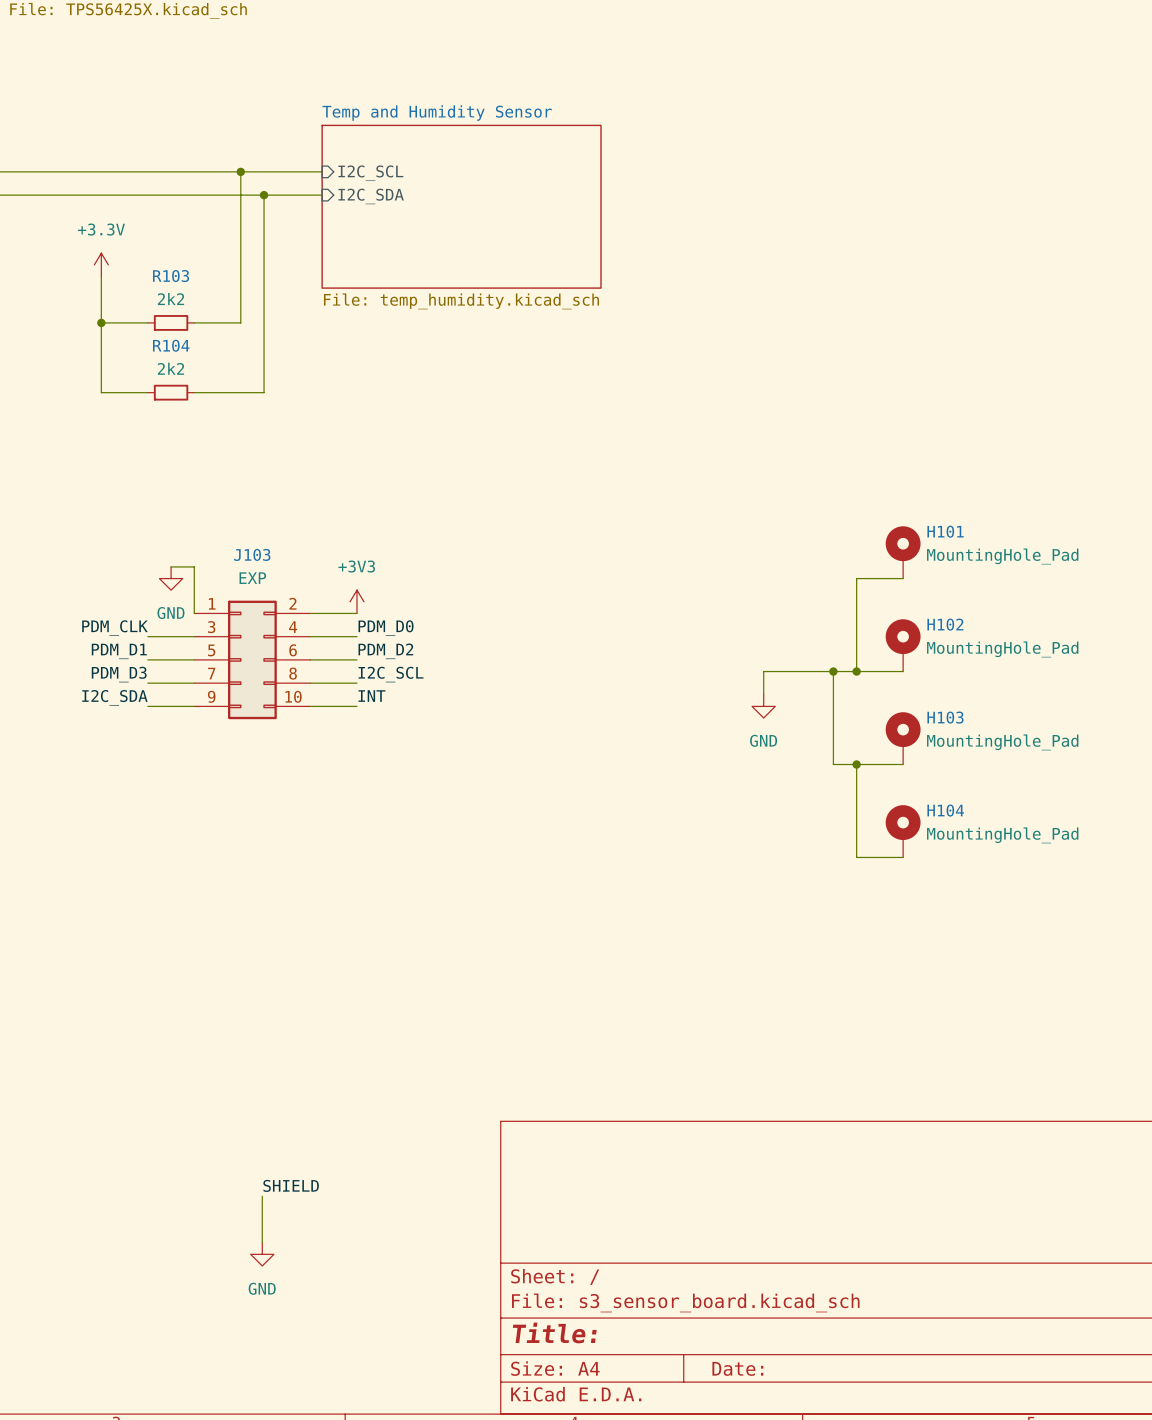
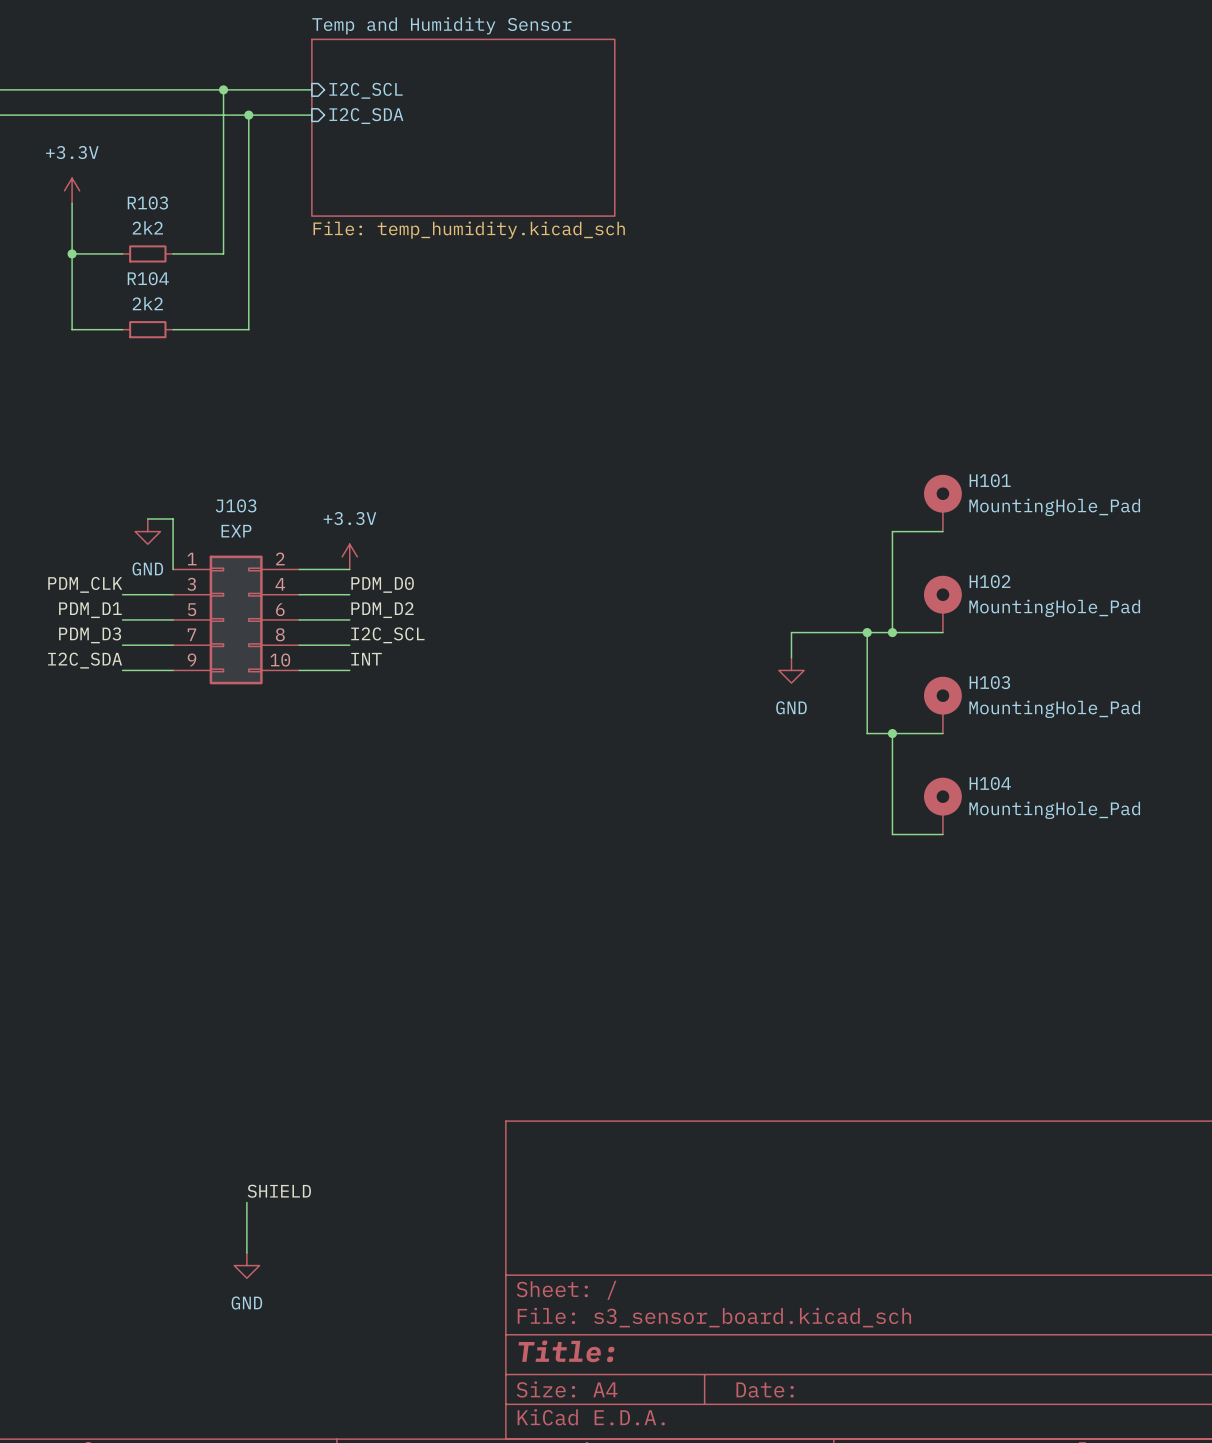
power symbol: +3V3 (356, 601) -> +3.3V (349, 556)

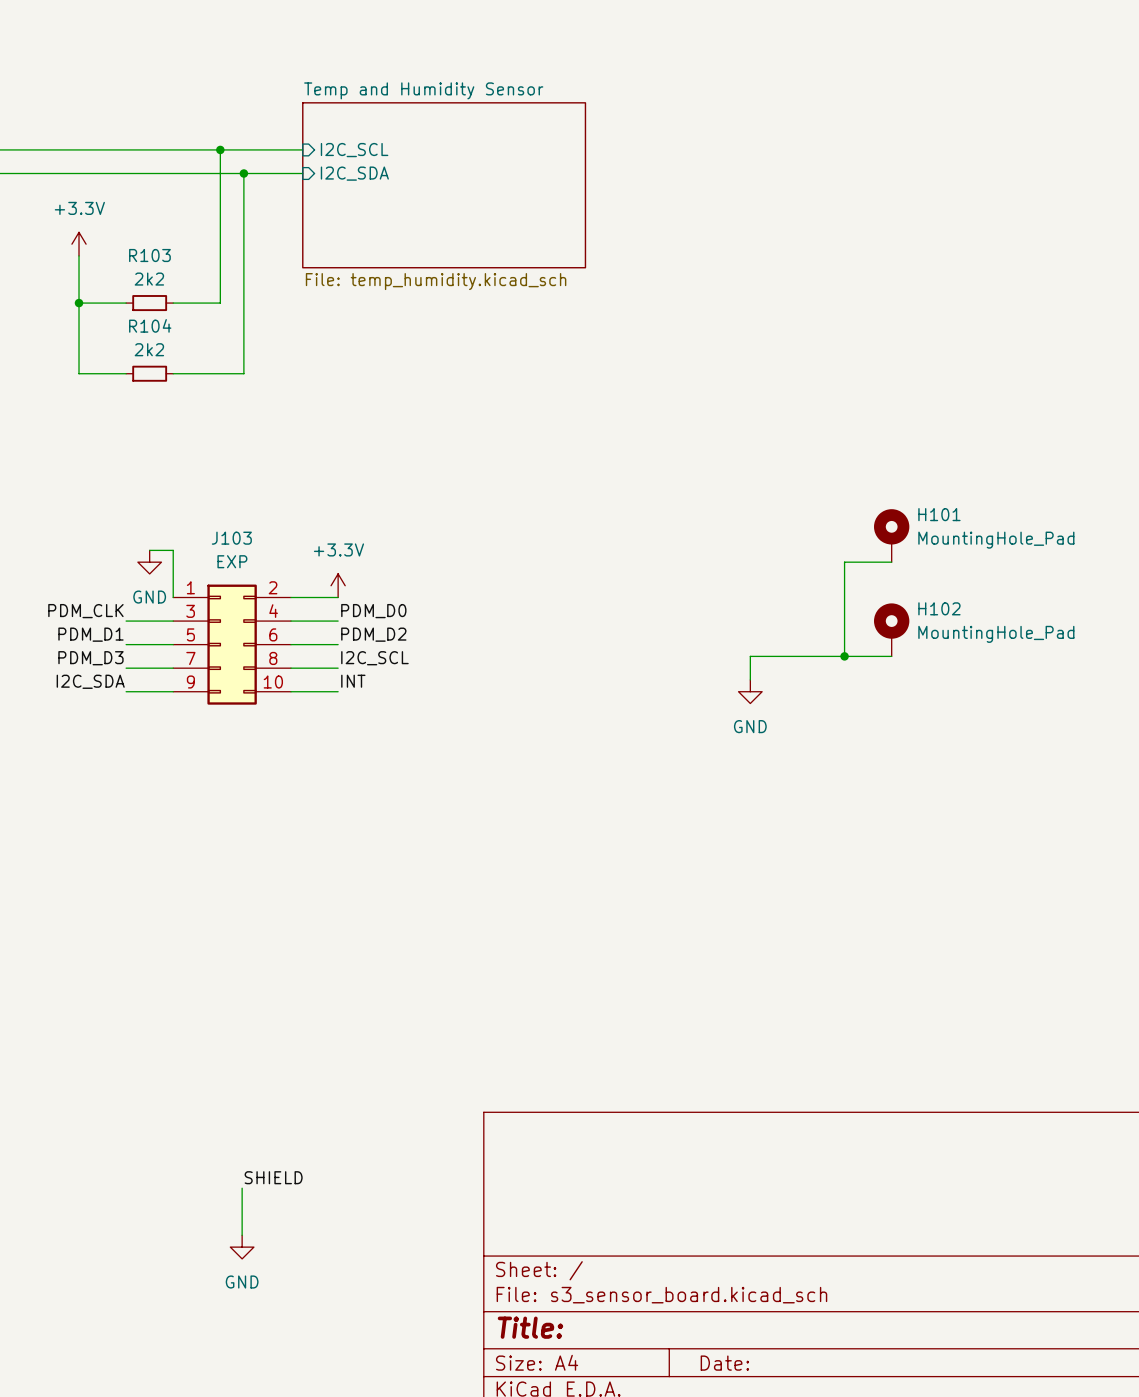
wire: (867, 632) (867, 733) (942, 733) -> none
junction: (867, 632) -> none
H103: MountingHole_Pad (942, 705) -> none
wire: (892, 733) (892, 834) (942, 834) -> none
junction: (892, 733) -> none
H104: MountingHole_Pad (942, 806) -> none

